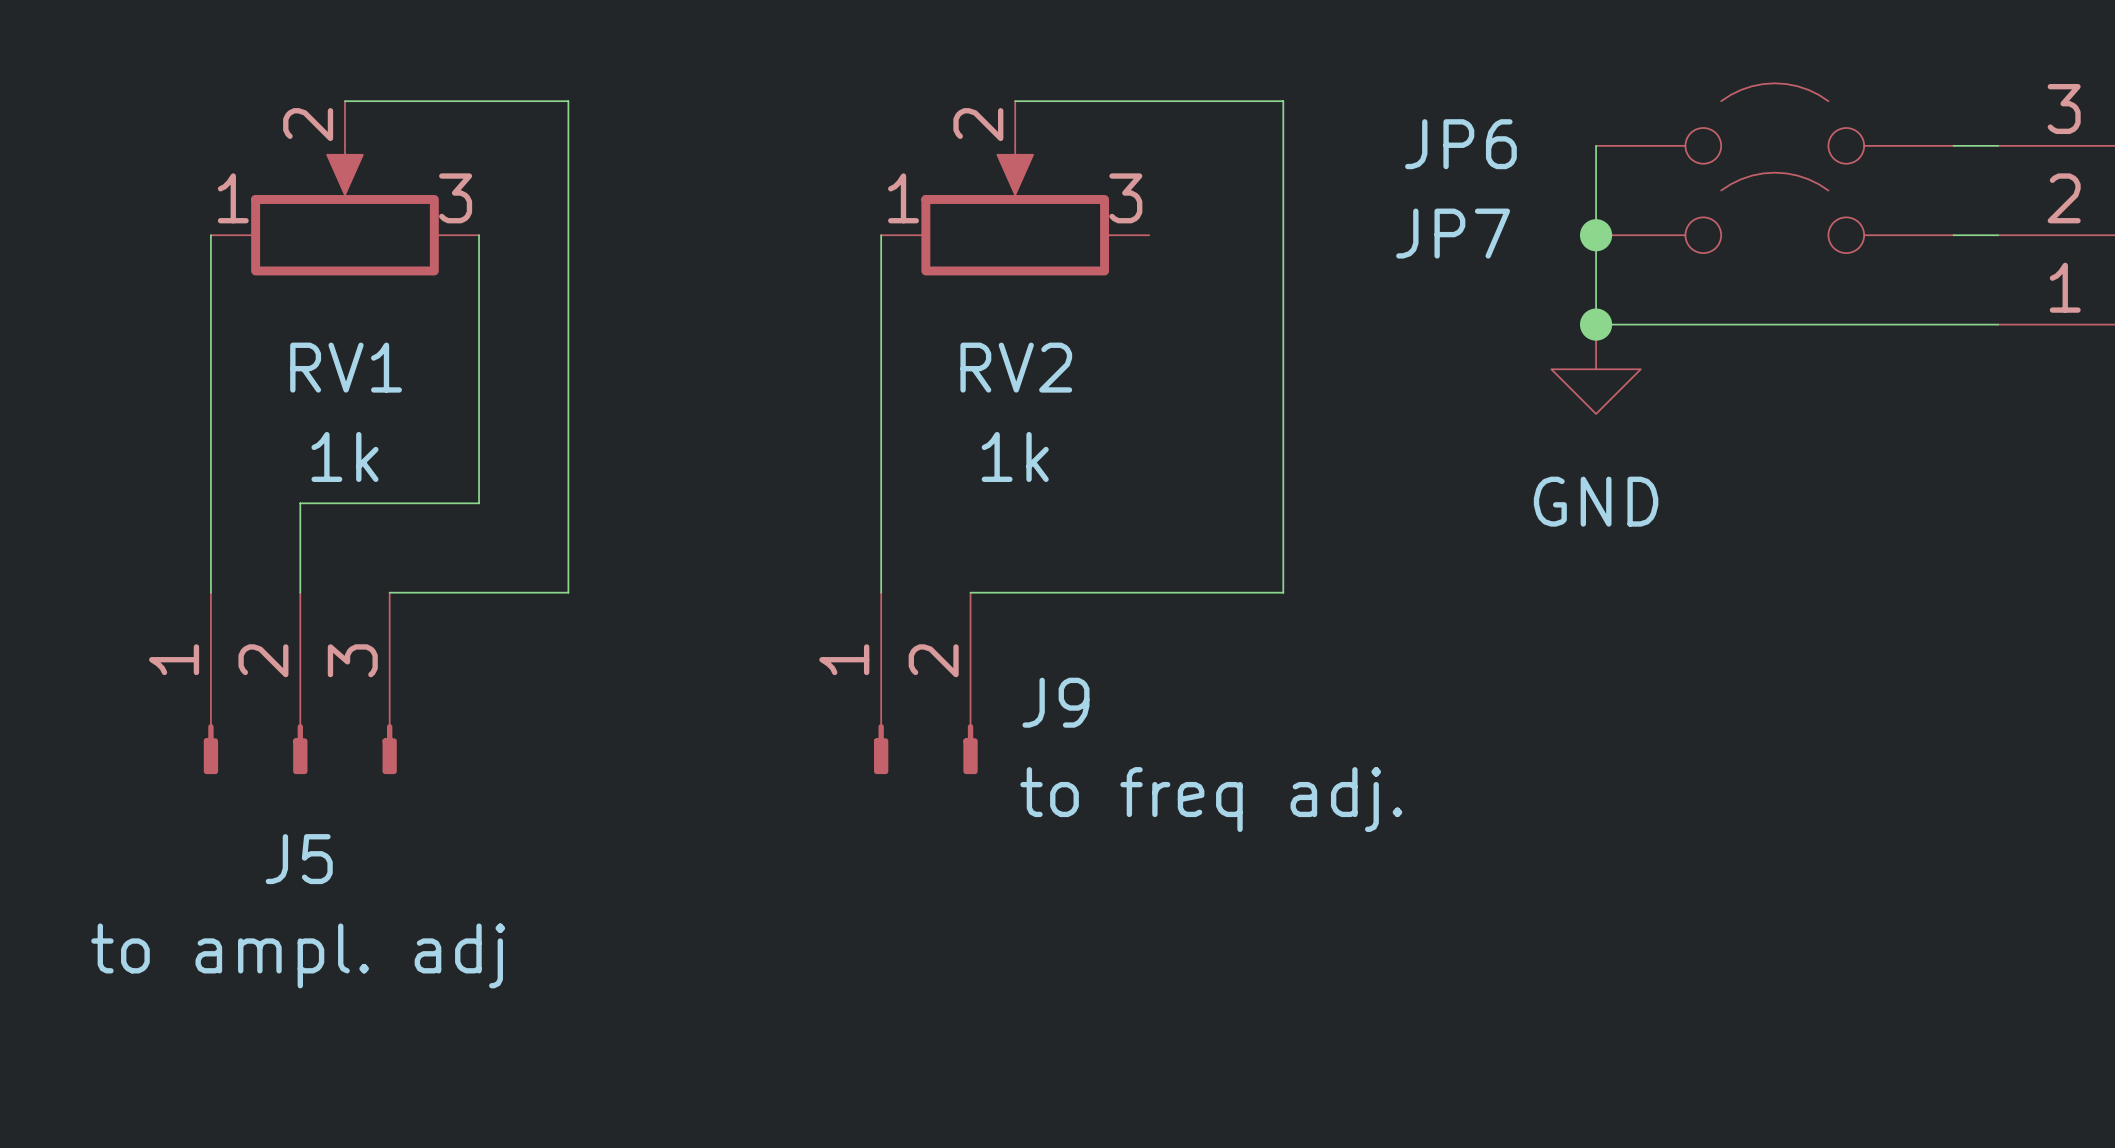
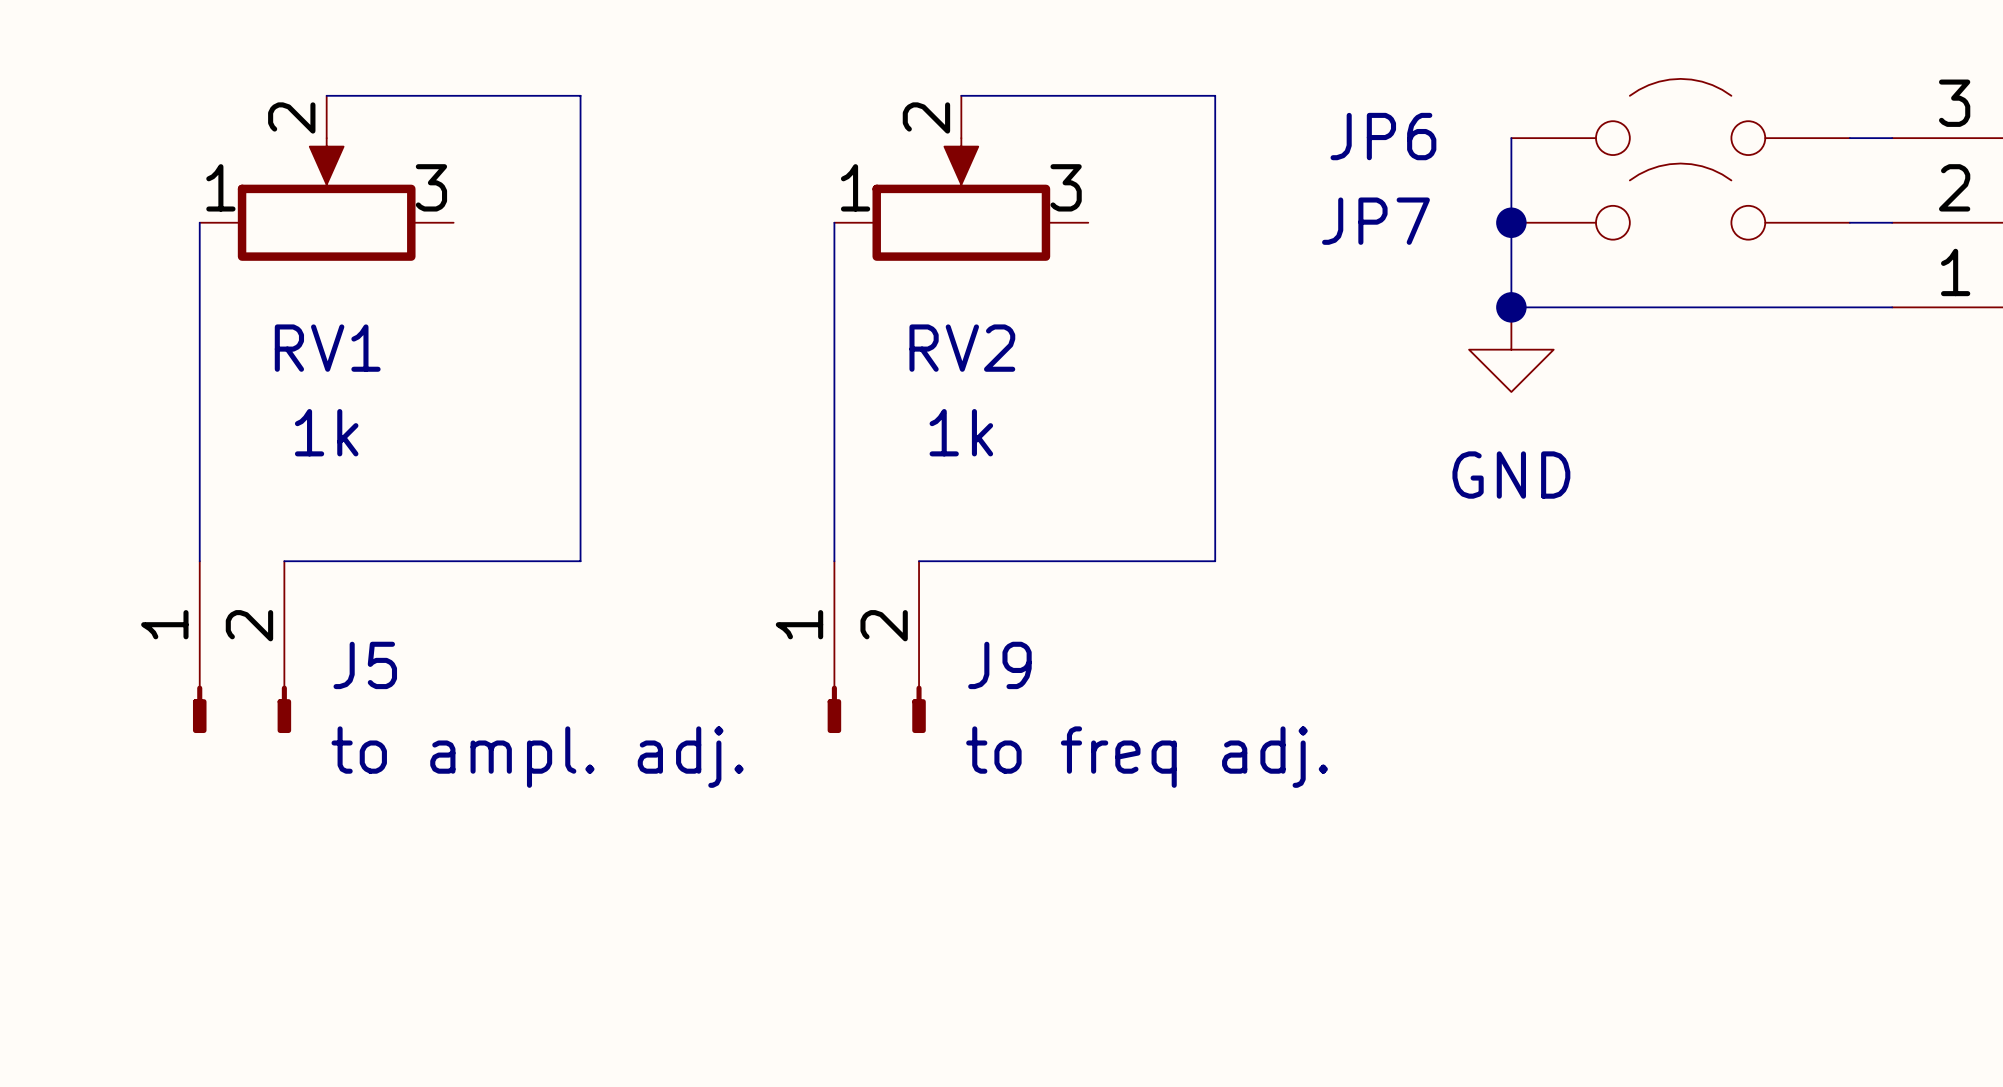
wire: (568, 101) (568, 592) -> (538, 95) (580, 95) (580, 561) (538, 561)
wire: (479, 235) (479, 503) (300, 503) (300, 592) -> (368, 561) (284, 561)
J5 symbol: [203, 592, 397, 775] -> [192, 561, 292, 734]
J5 name position: J5 (299, 859) -> J5 (365, 665)
J5 value: to ampl. adj (298, 955) -> to ampl. adj. (537, 757)

